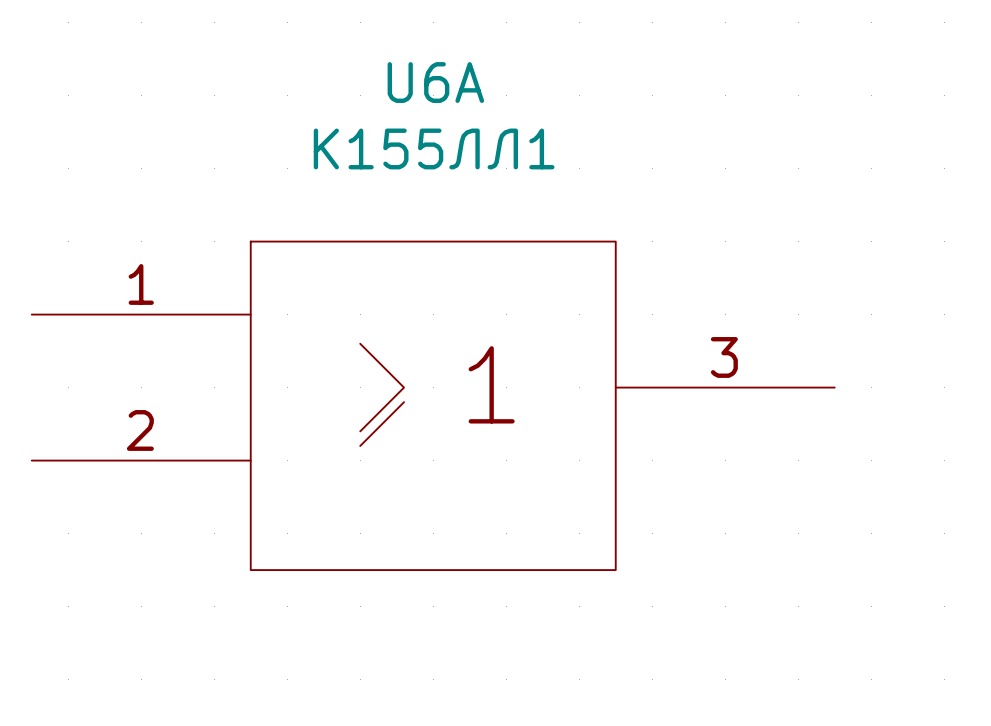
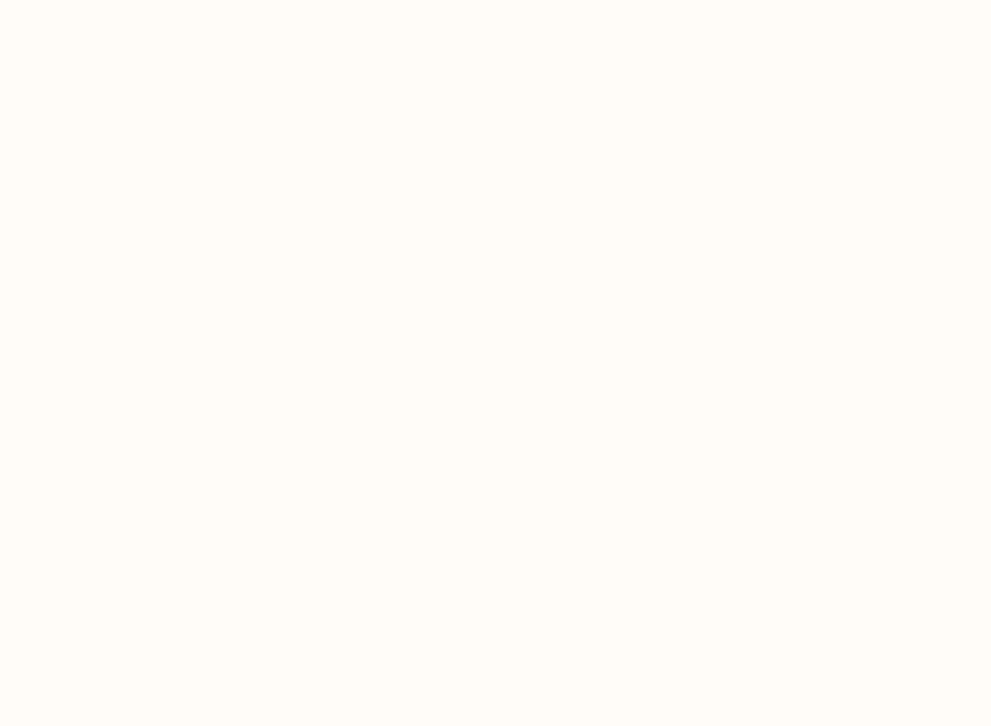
U6A: К155ЛЛ1 (433, 405) -> none

